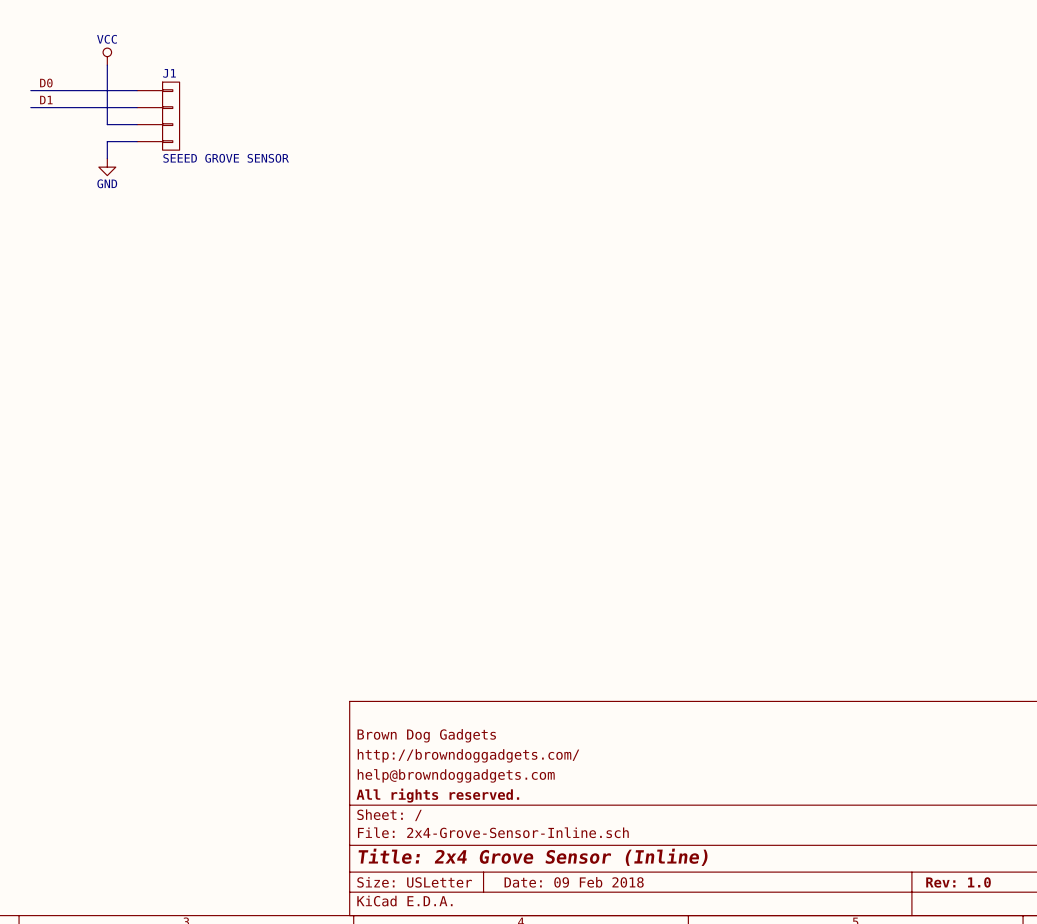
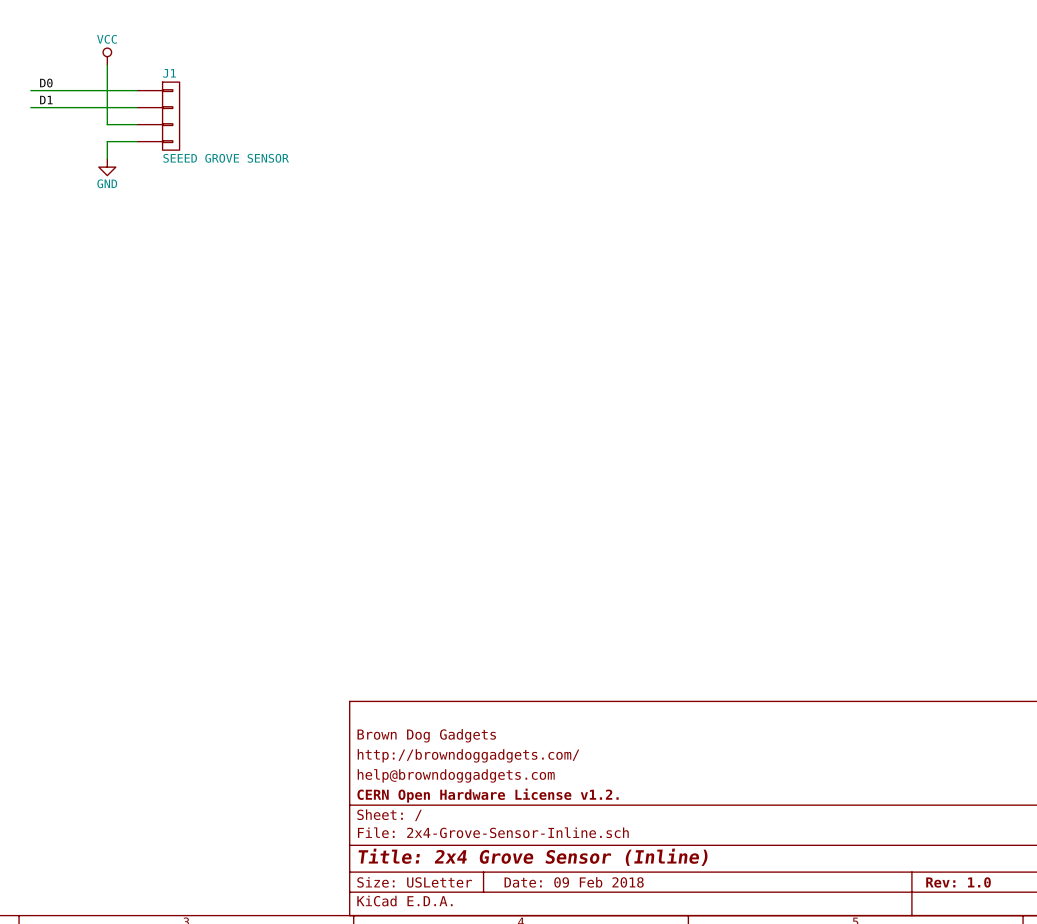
title block: All rights reserved. (437, 795) -> CERN Open Hardware License v1.2. (488, 795)

